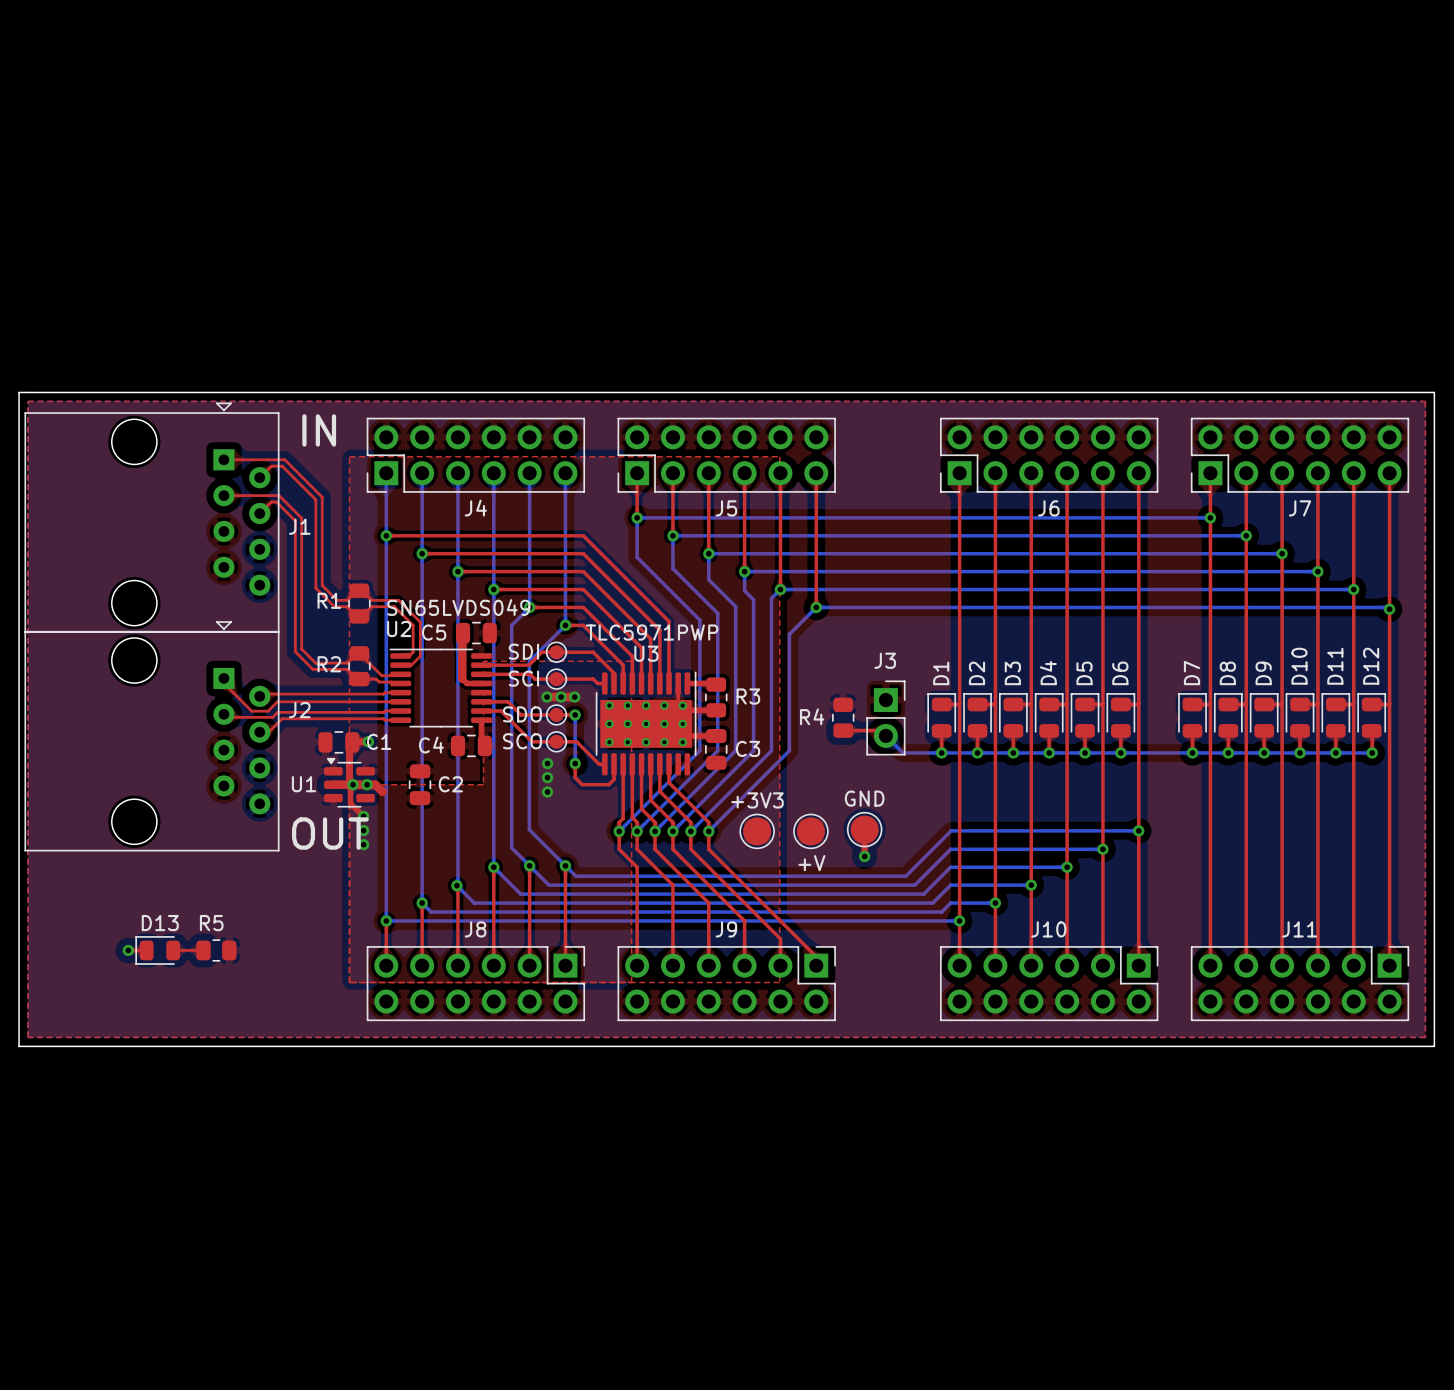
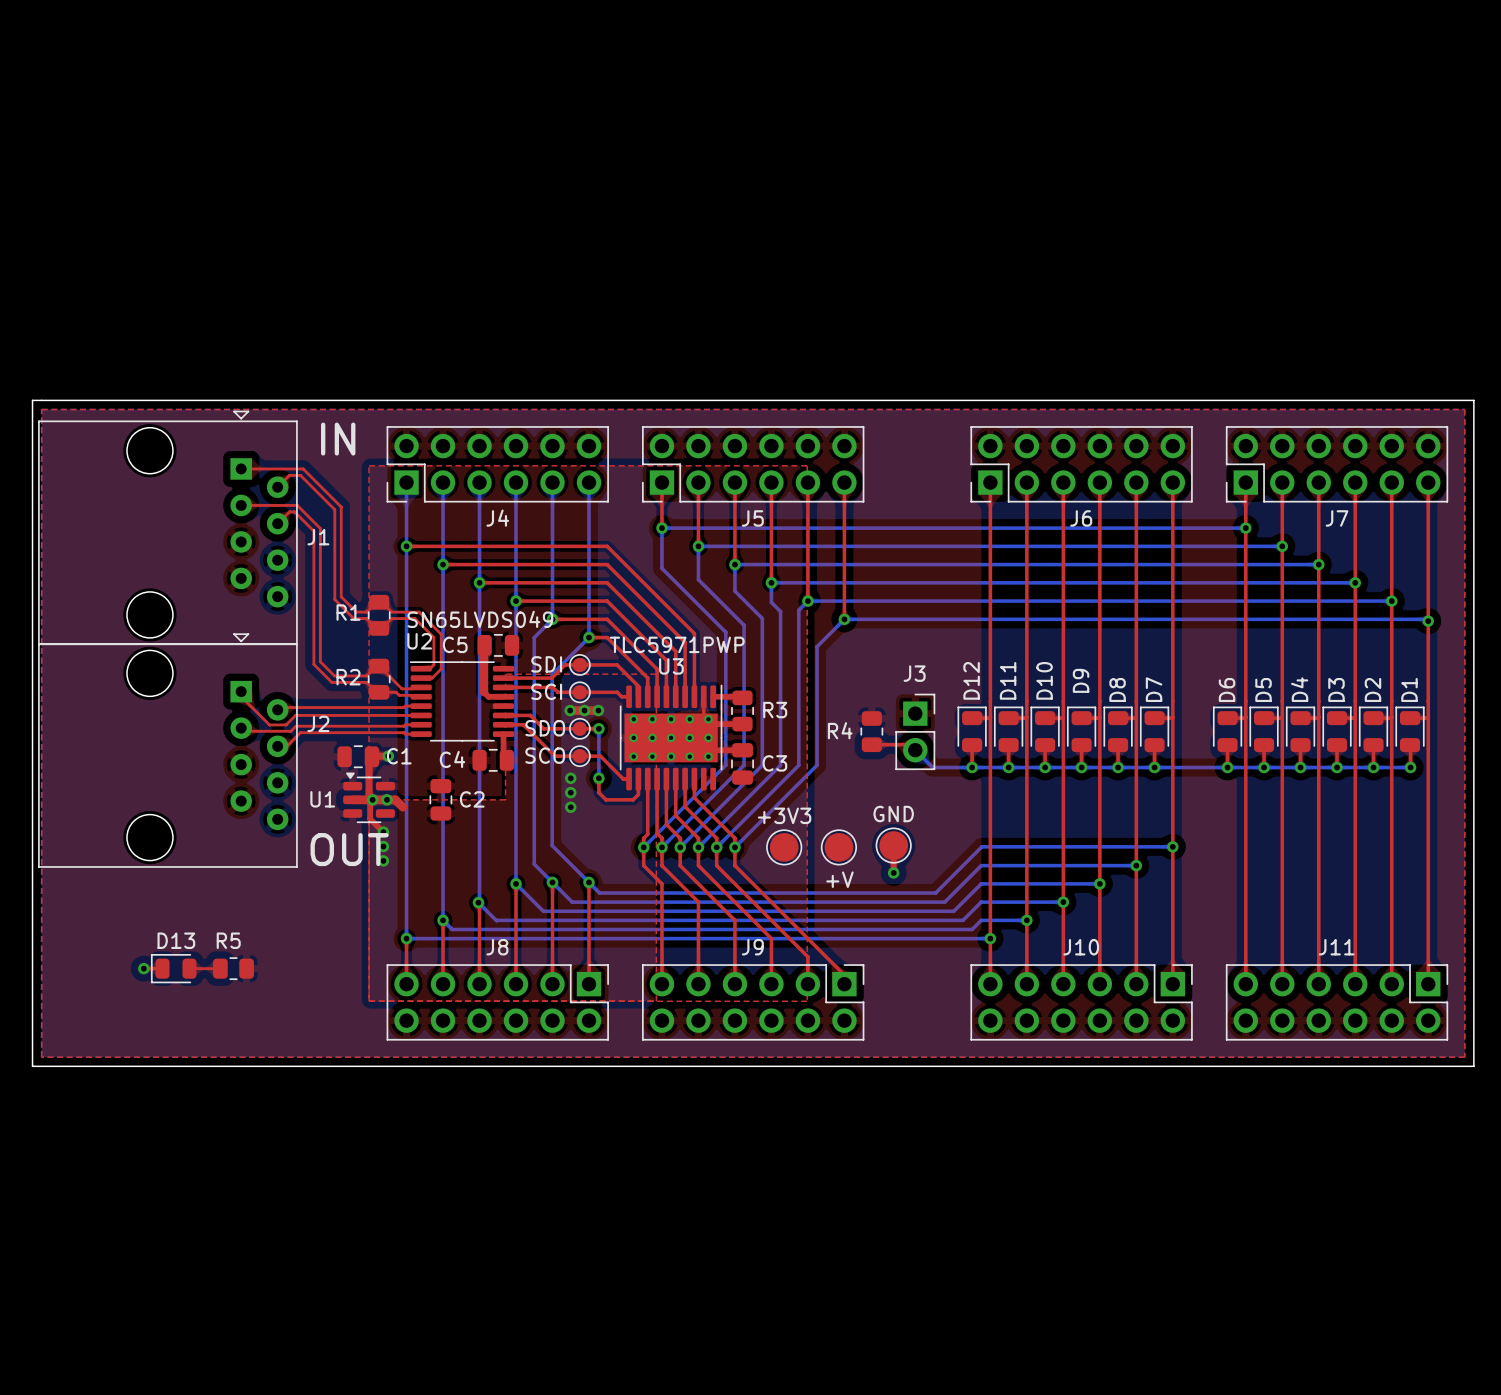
D10 name: D10 (1299, 666) -> D3 (1336, 689)
D11 name: D11 (1335, 666) -> D2 (1372, 689)
D12 name: D12 (1371, 666) -> D1 (1409, 689)
D1 name: D1 (941, 673) -> D12 (971, 680)
D2 name: D2 (977, 673) -> D11 (1008, 680)
D3 name: D3 (1012, 673) -> D10 (1044, 680)
D4 name: D4 (1048, 673) -> D9 (1081, 680)
D5 name: D5 (1084, 673) -> D8 (1117, 689)
D6 name: D6 (1120, 673) -> D7 (1154, 689)
D7 name: D7 (1191, 673) -> D6 (1227, 689)
D8 name: D8 (1227, 673) -> D5 (1263, 689)
D9 name: D9 (1263, 673) -> D4 (1299, 689)

